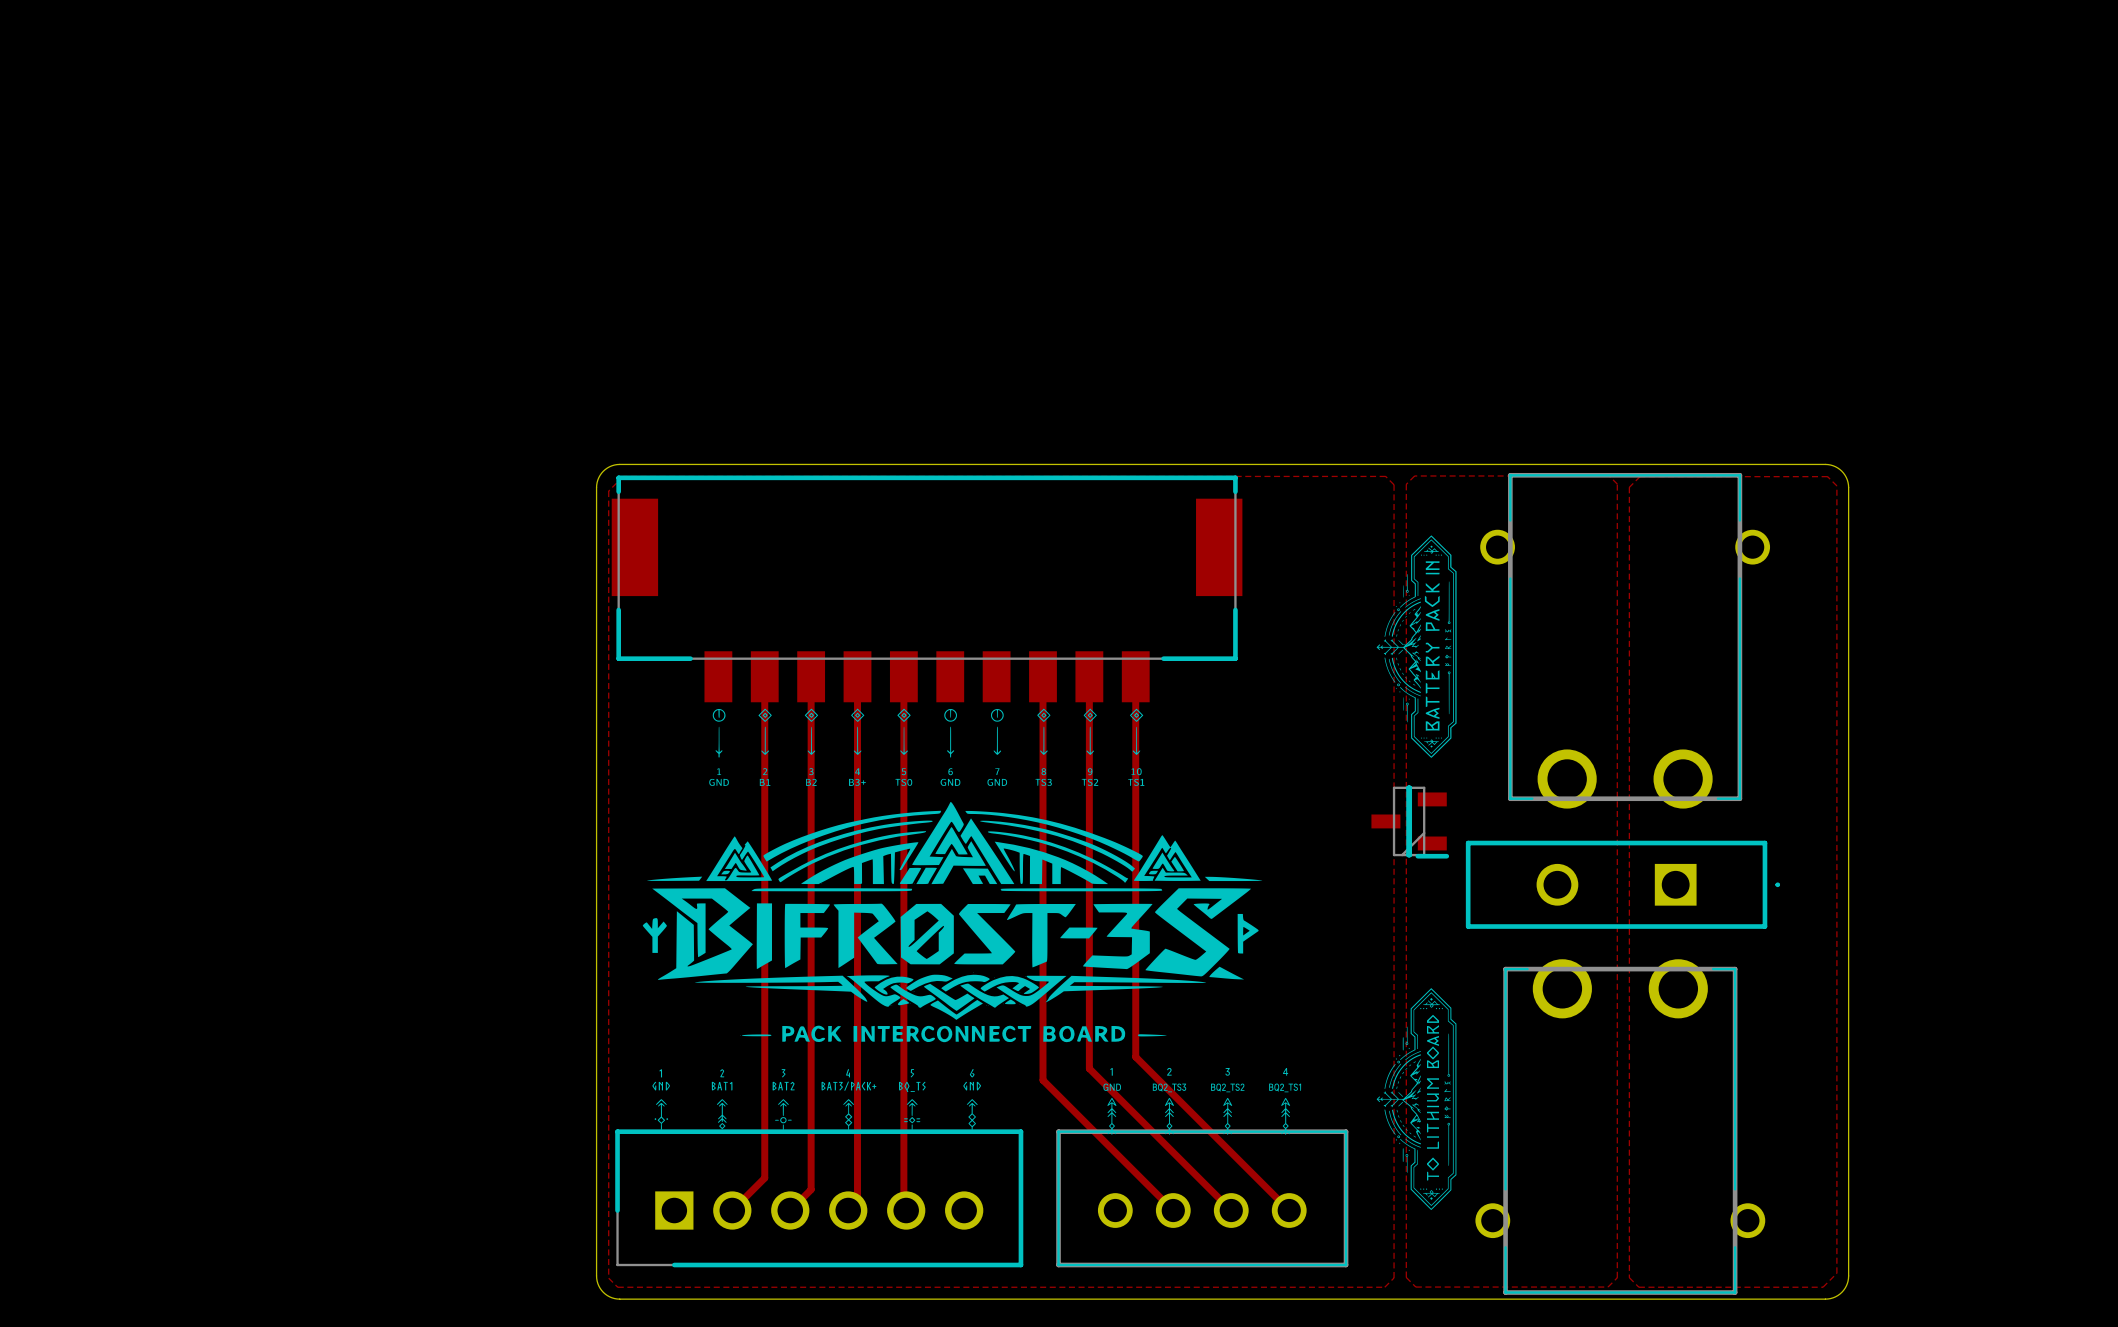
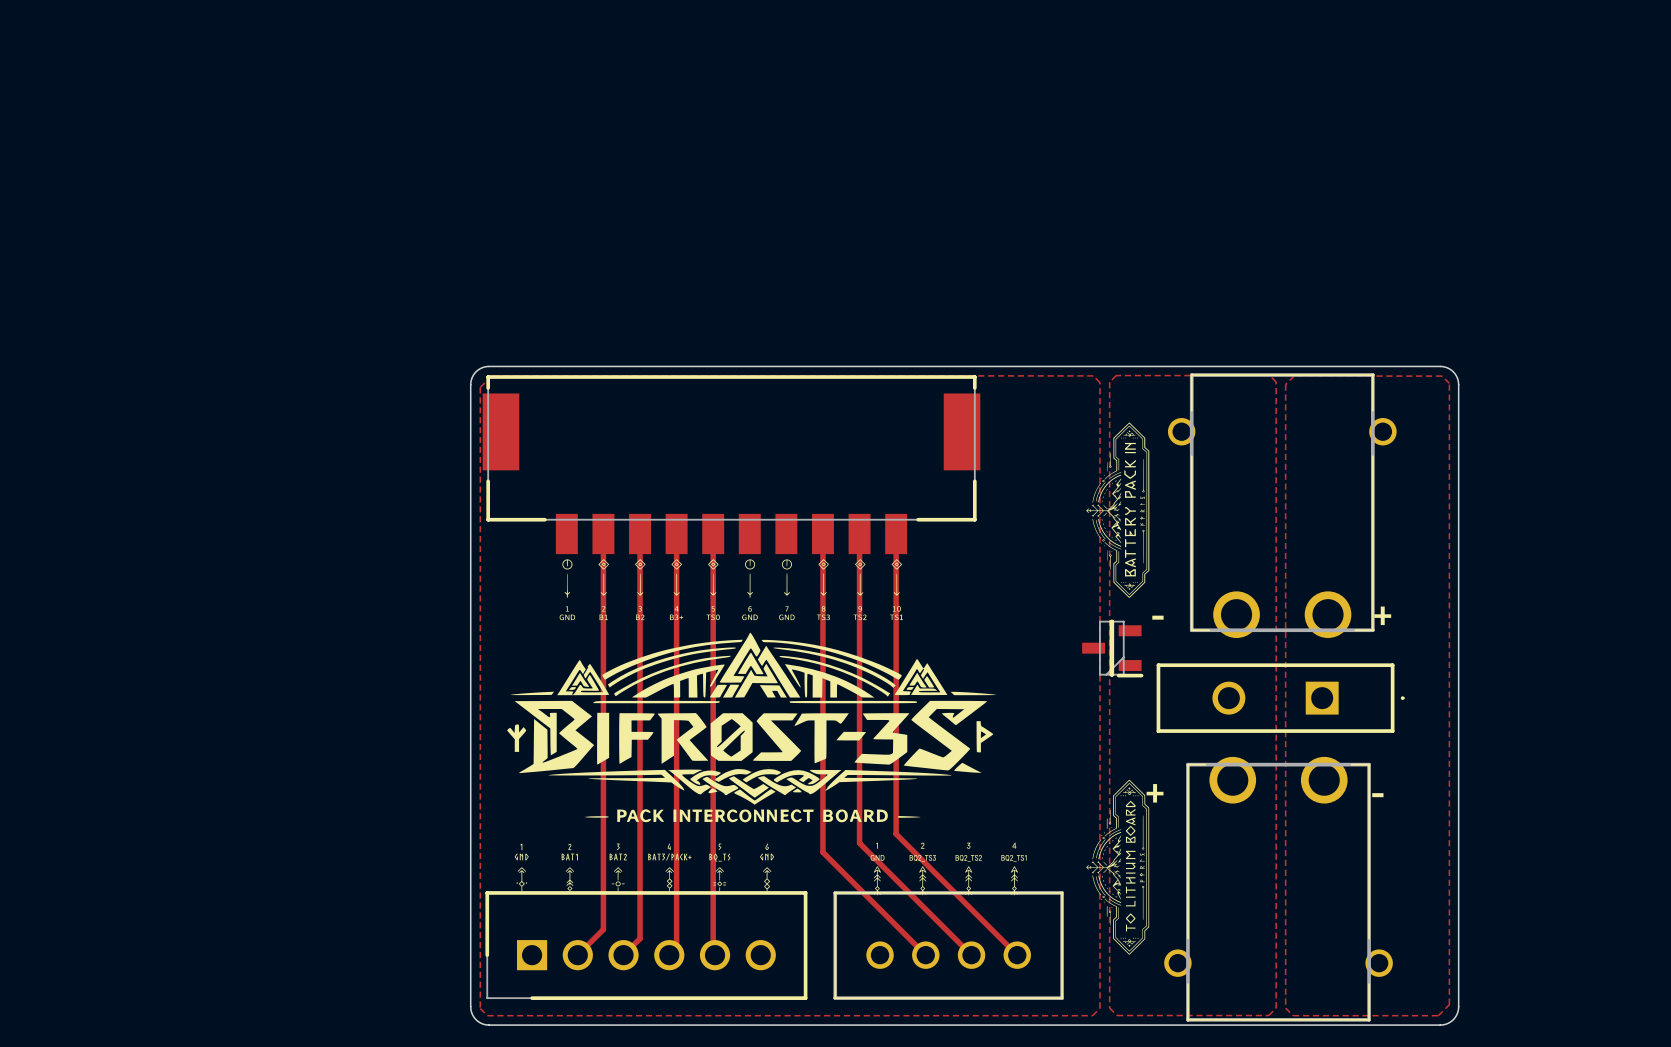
text: none -> - (1157, 617)
text: none -> + (1382, 615)
text: none -> + (1155, 793)
text: none -> - (1377, 795)

